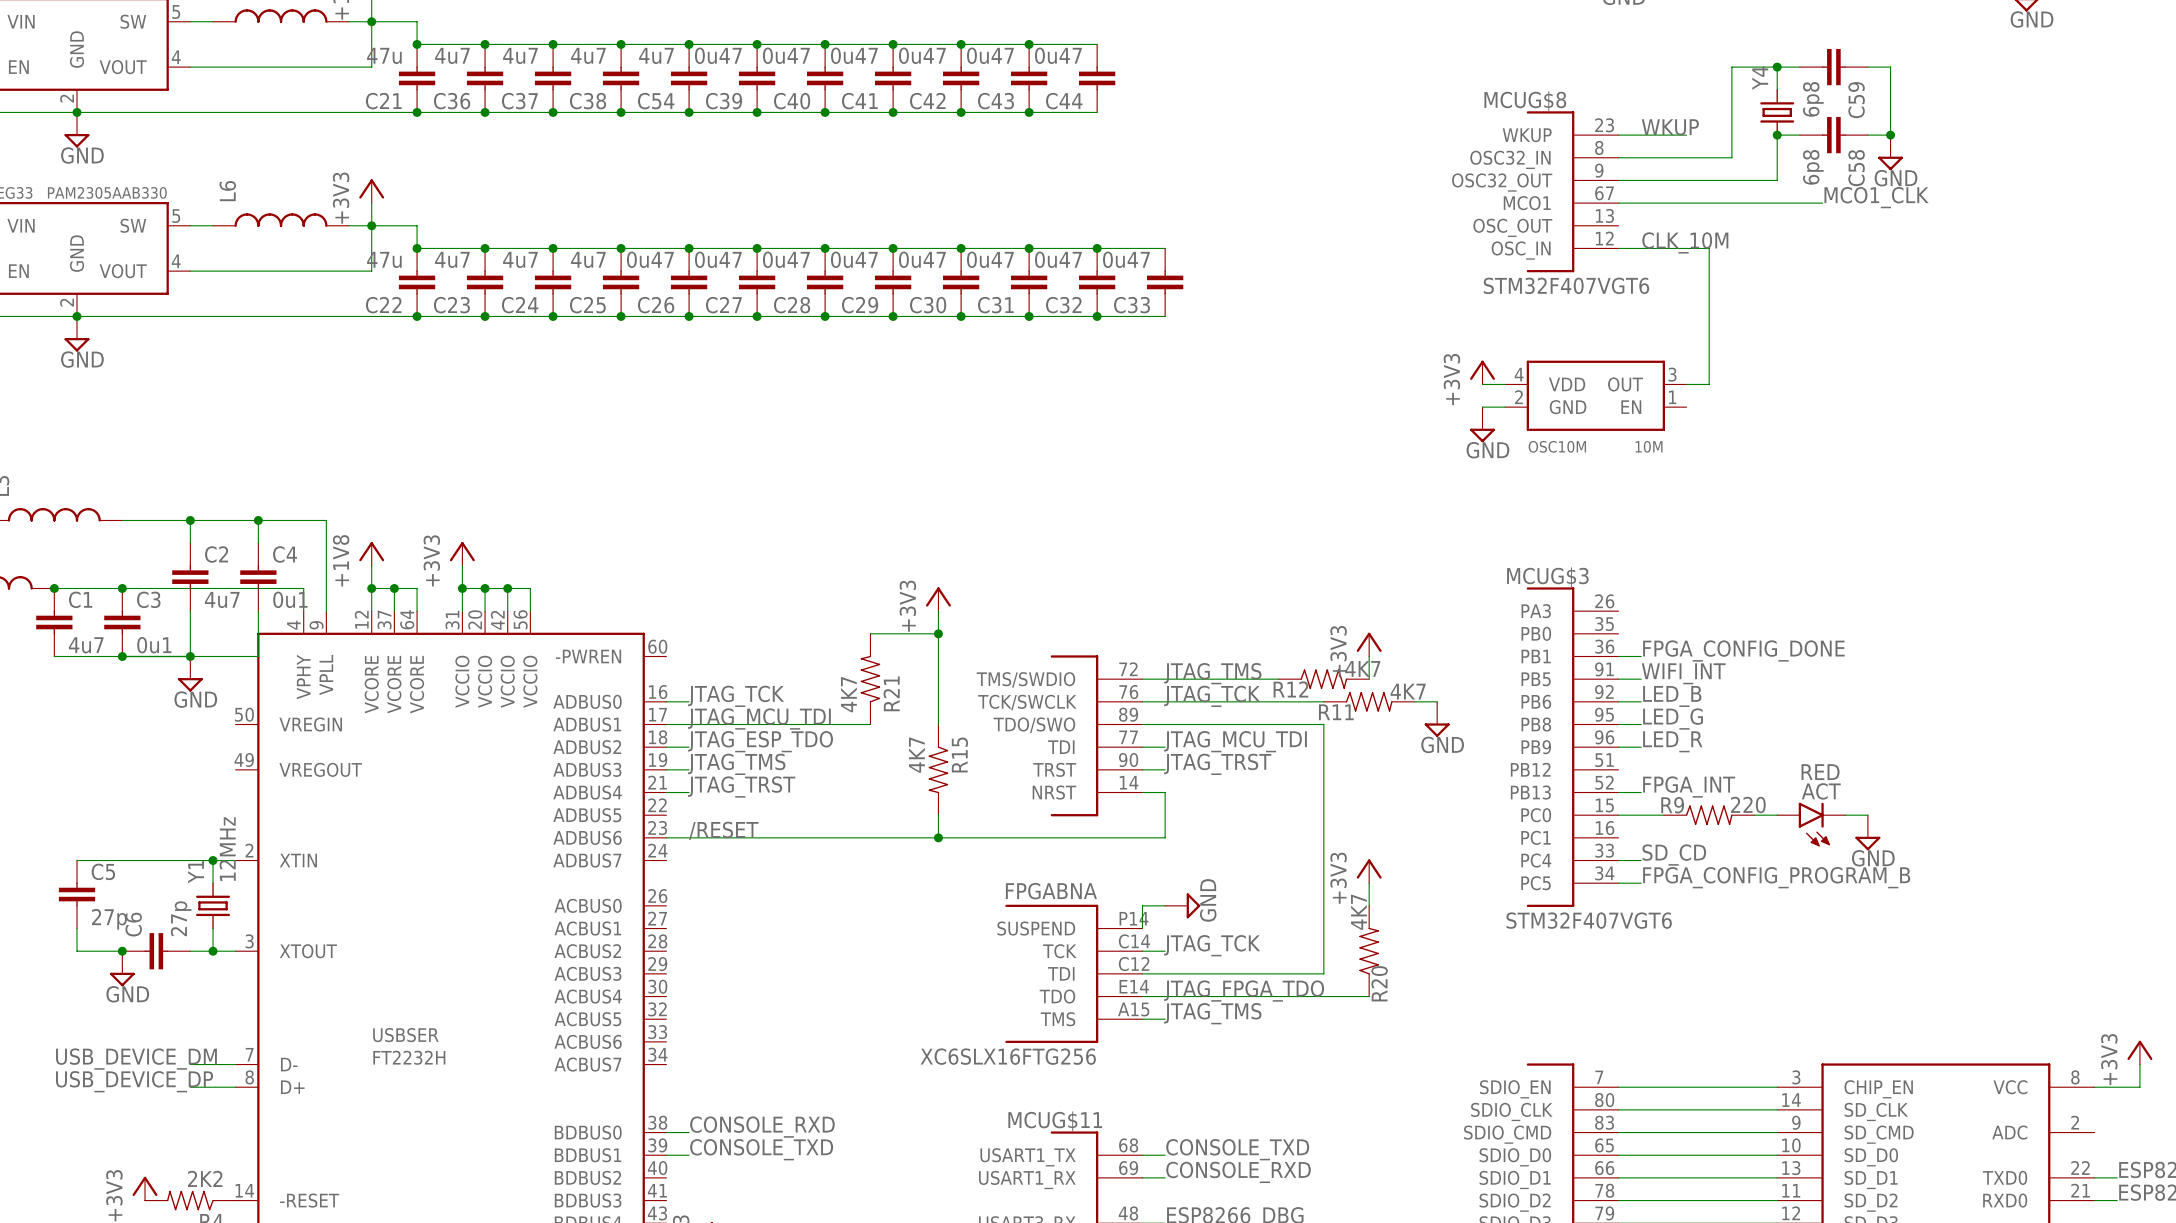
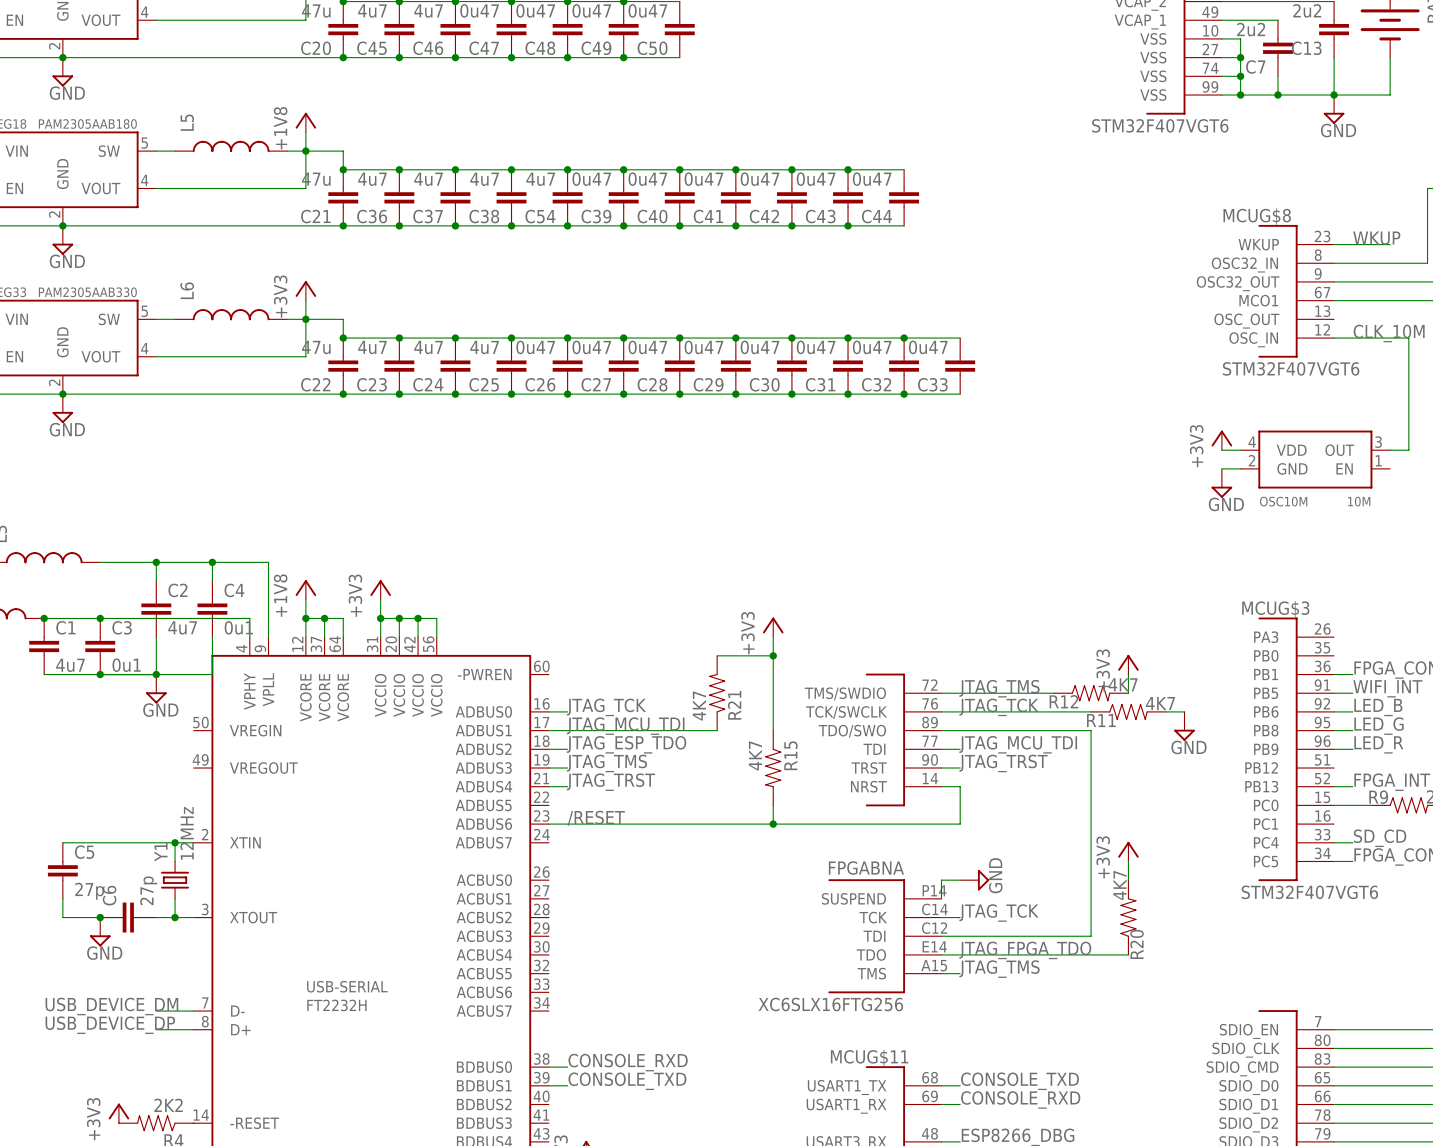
USBSER name: USBSER (405, 1035) -> USB-SERIAL (347, 986)

